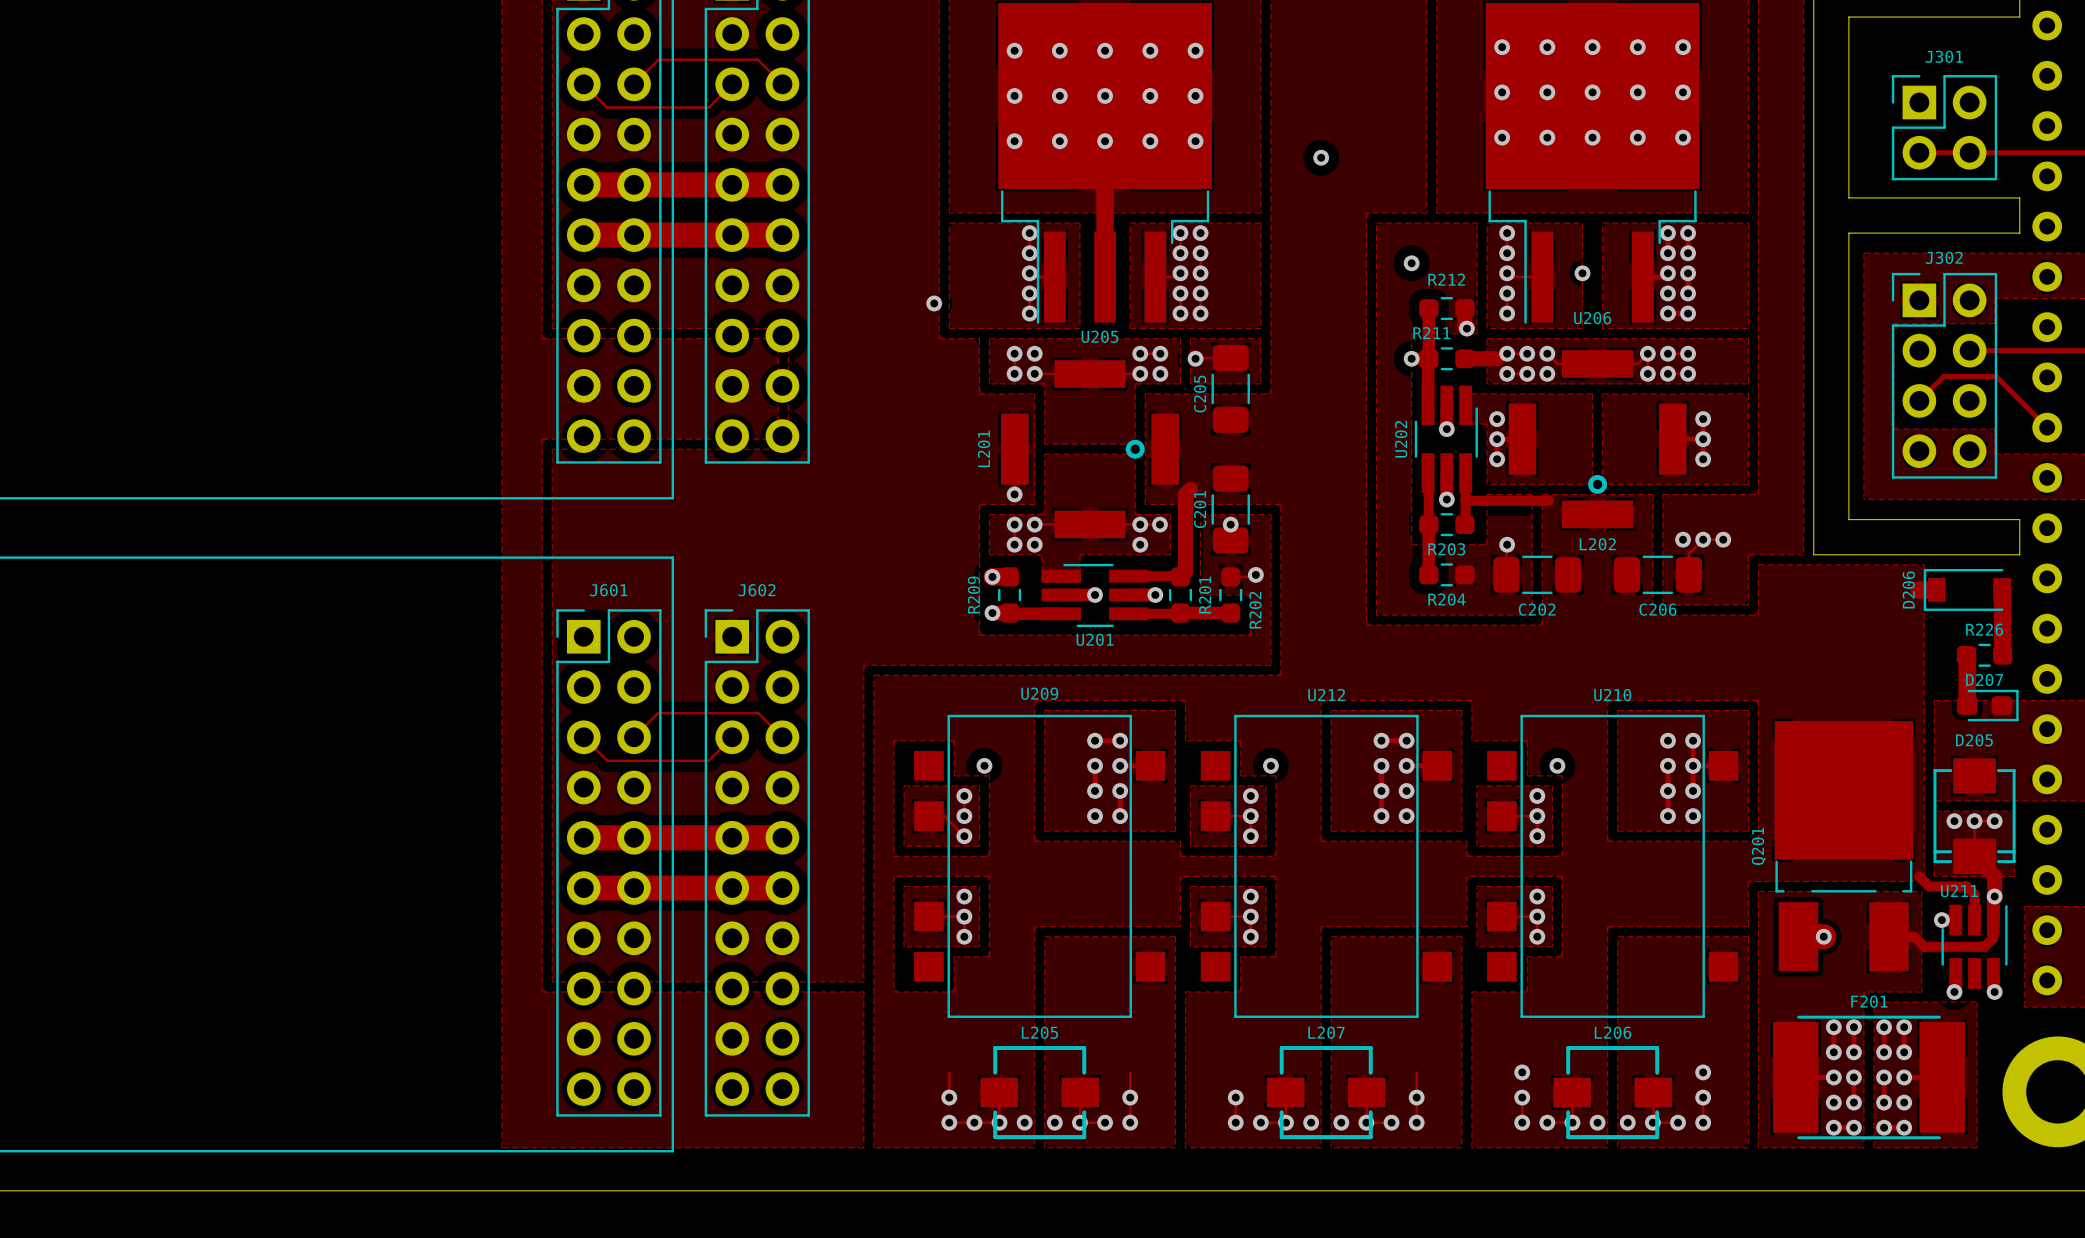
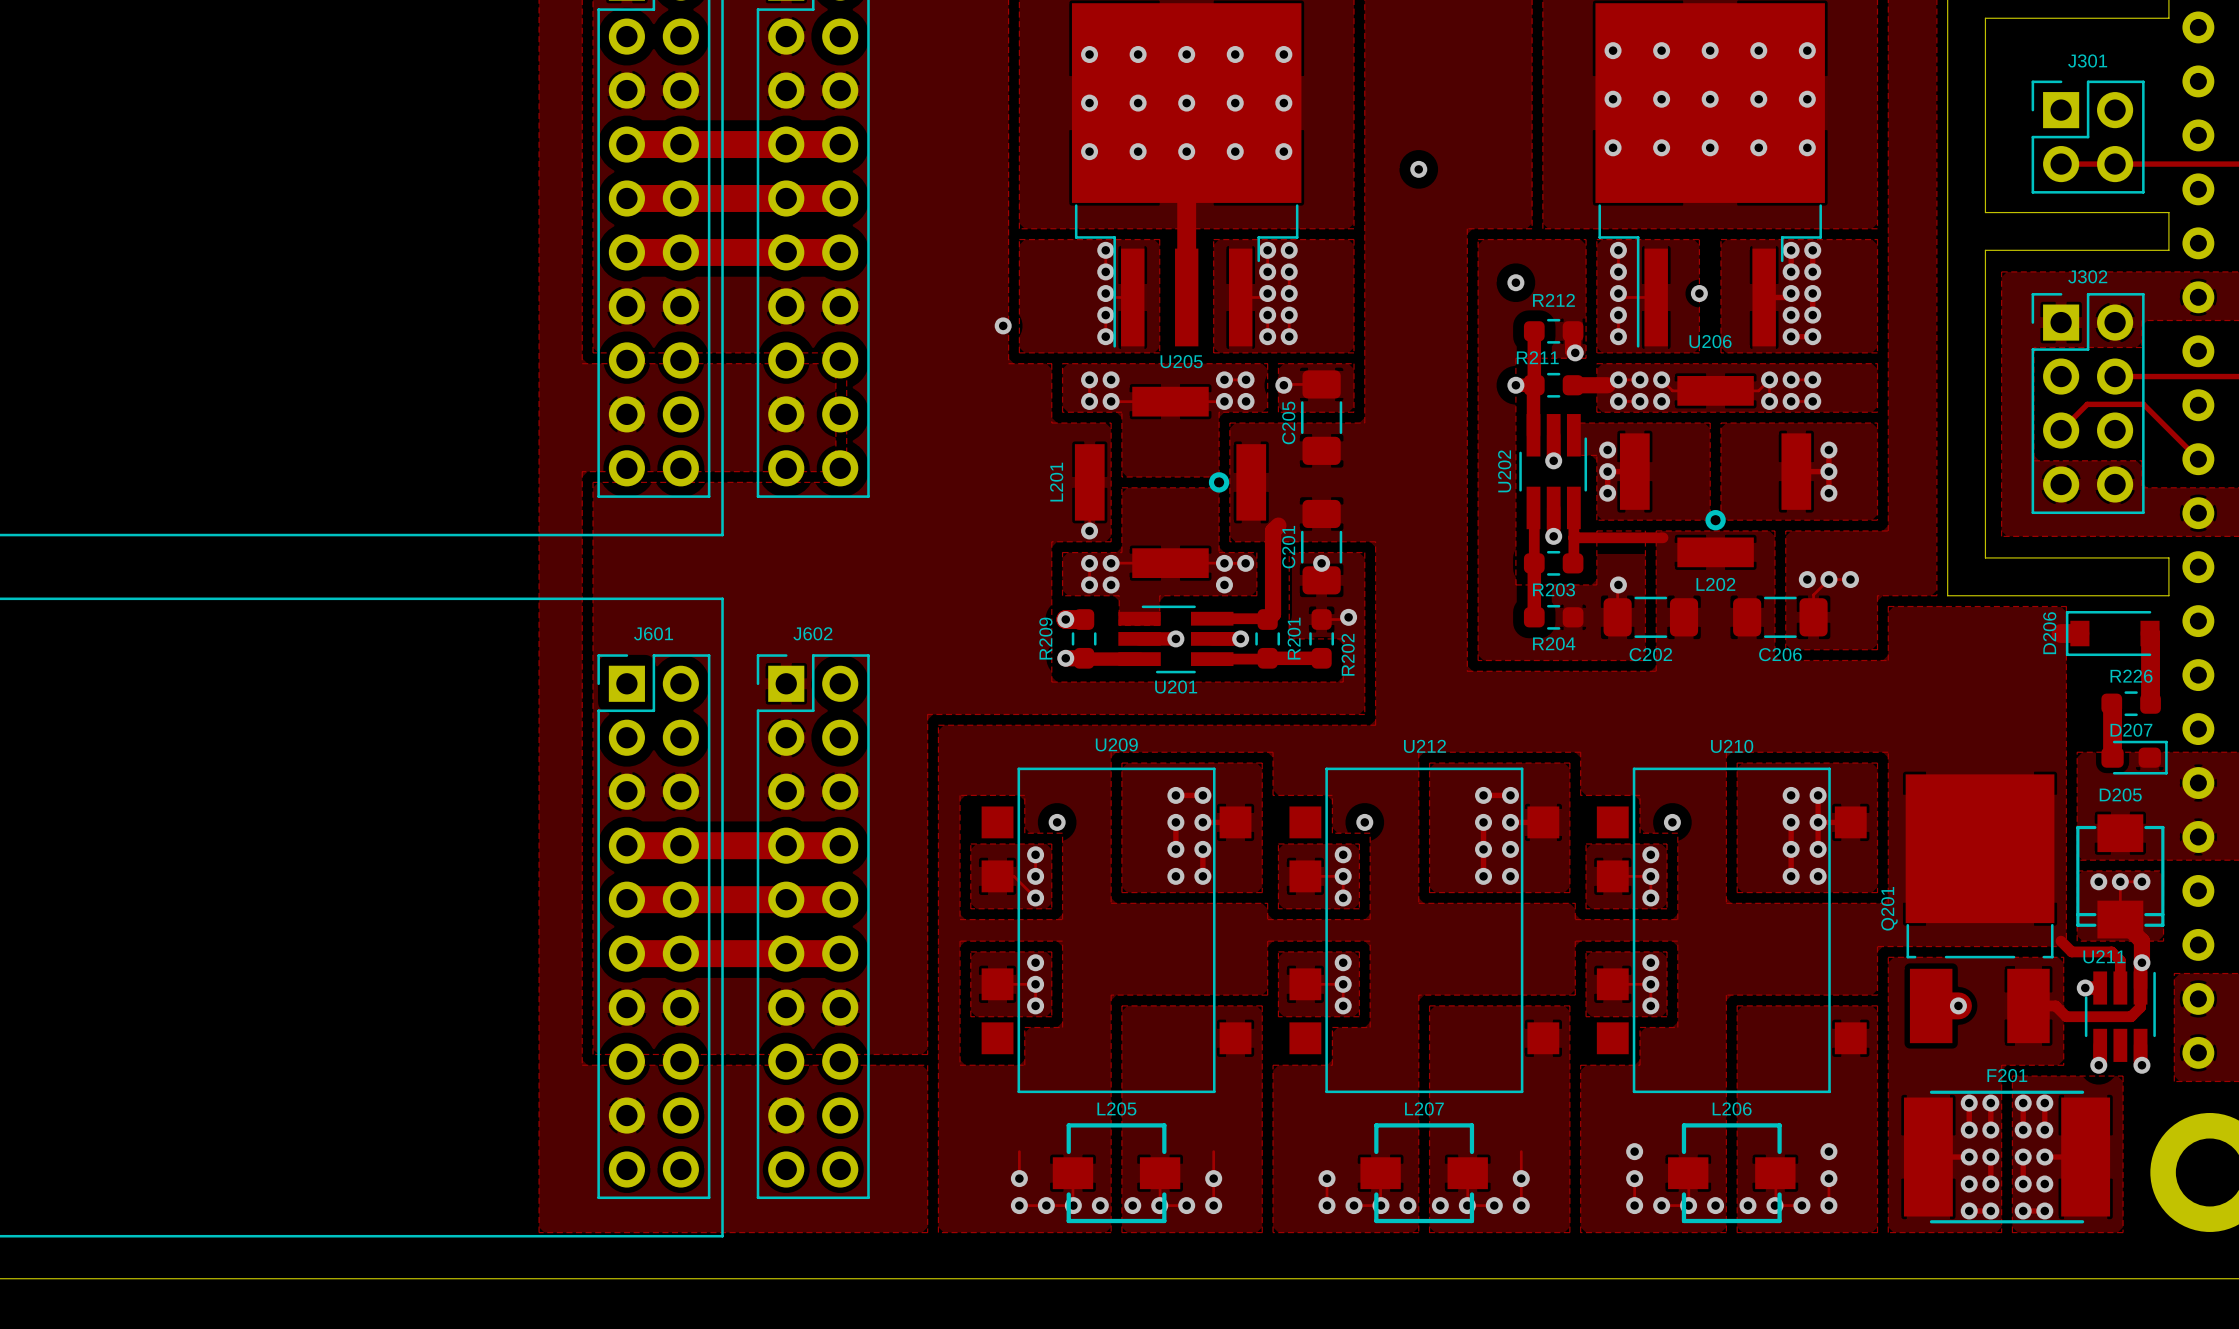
track: (583, 84) (606, 107) (709, 107) (732, 84) -> none
track: (634, 84) (658, 59) (757, 59) (782, 84) -> none
track: none -> (626, 144) (840, 144)
track: (583, 737) (607, 760) (708, 760) (732, 737) -> none
track: (634, 737) (658, 713) (758, 713) (782, 737) -> none
track: none -> (626, 845) (840, 845)

